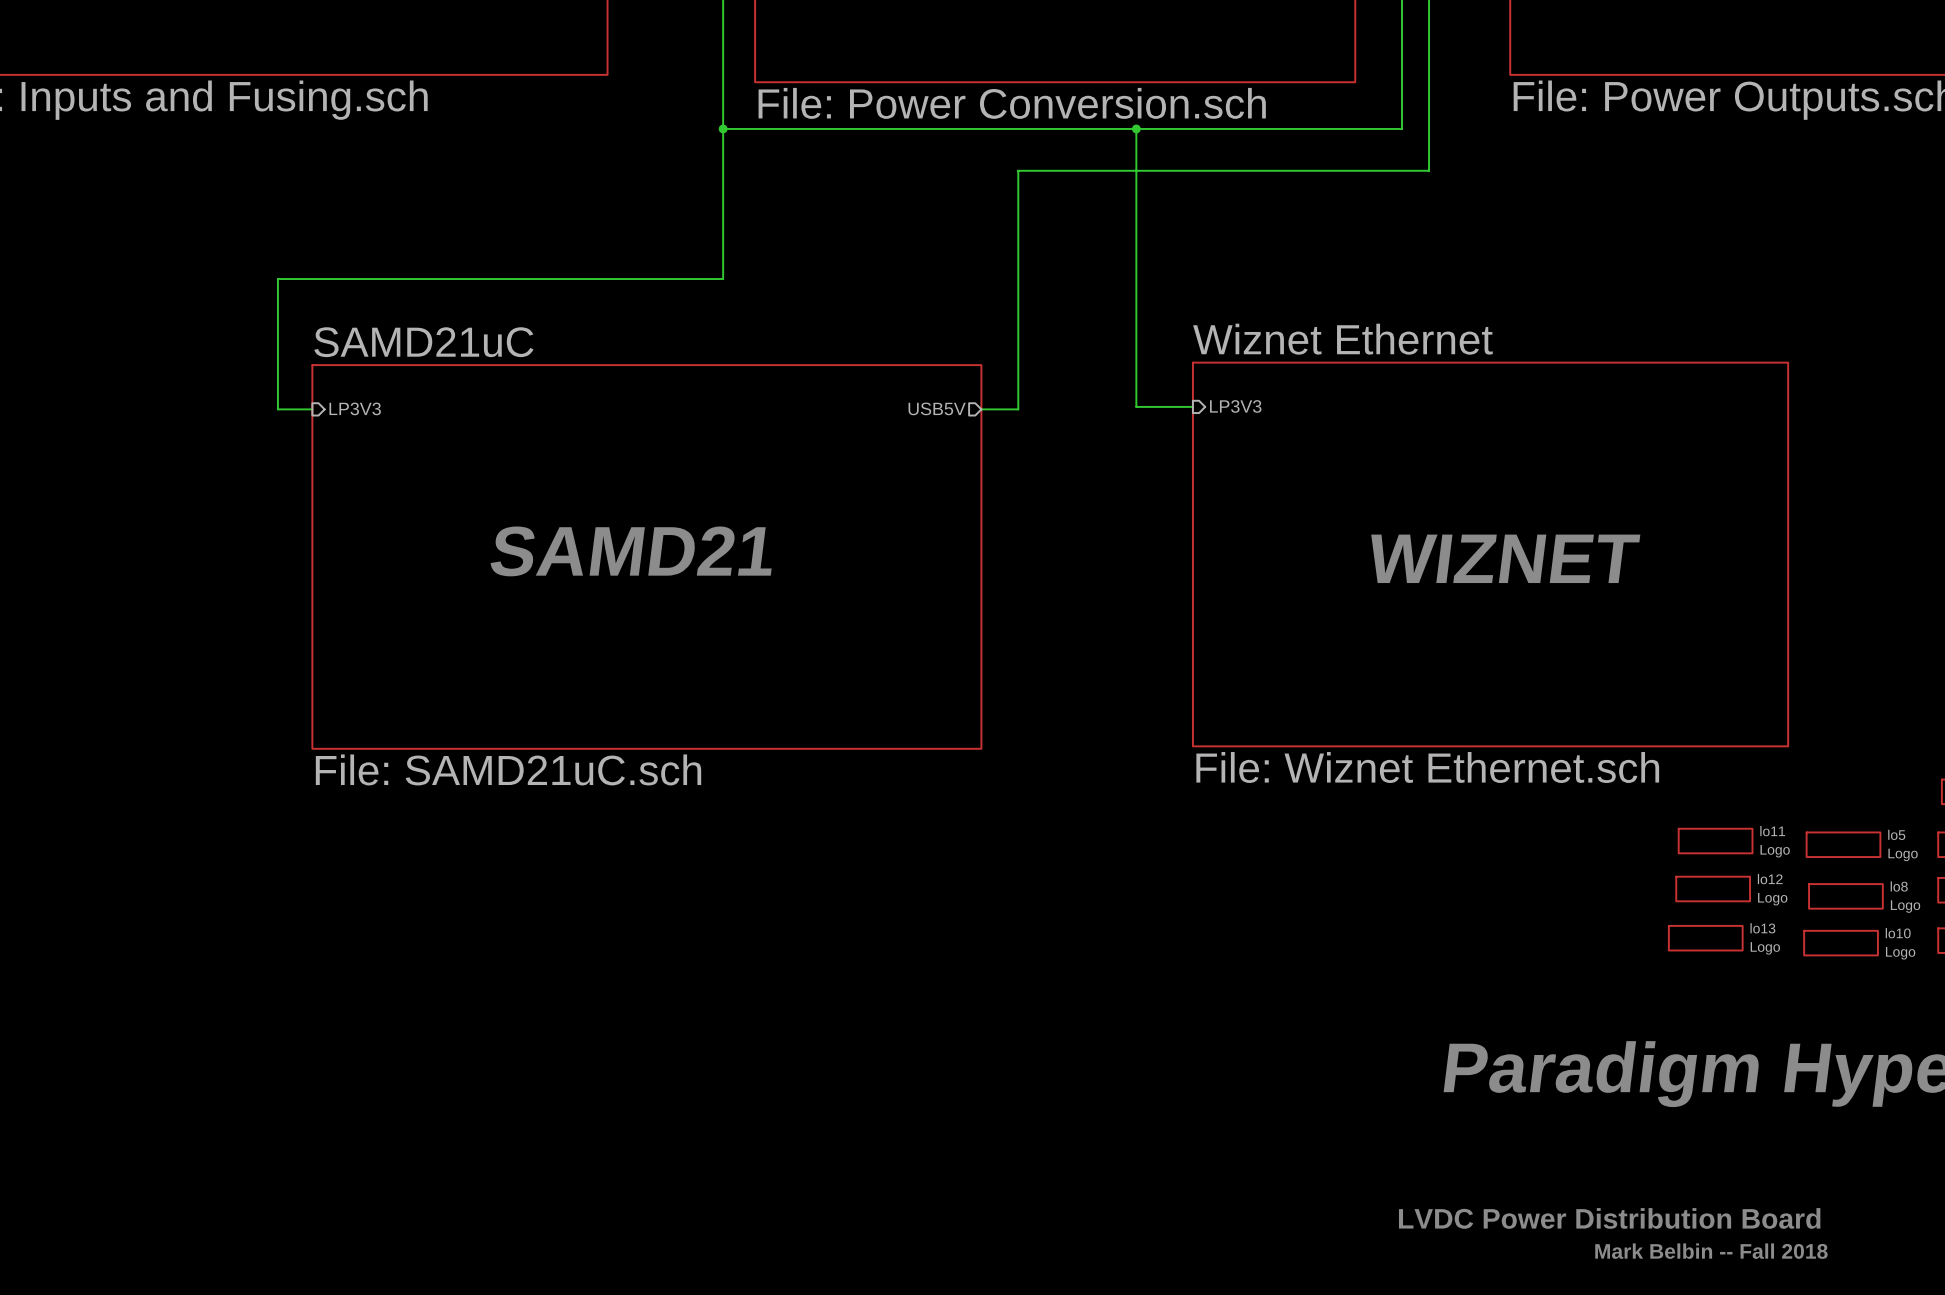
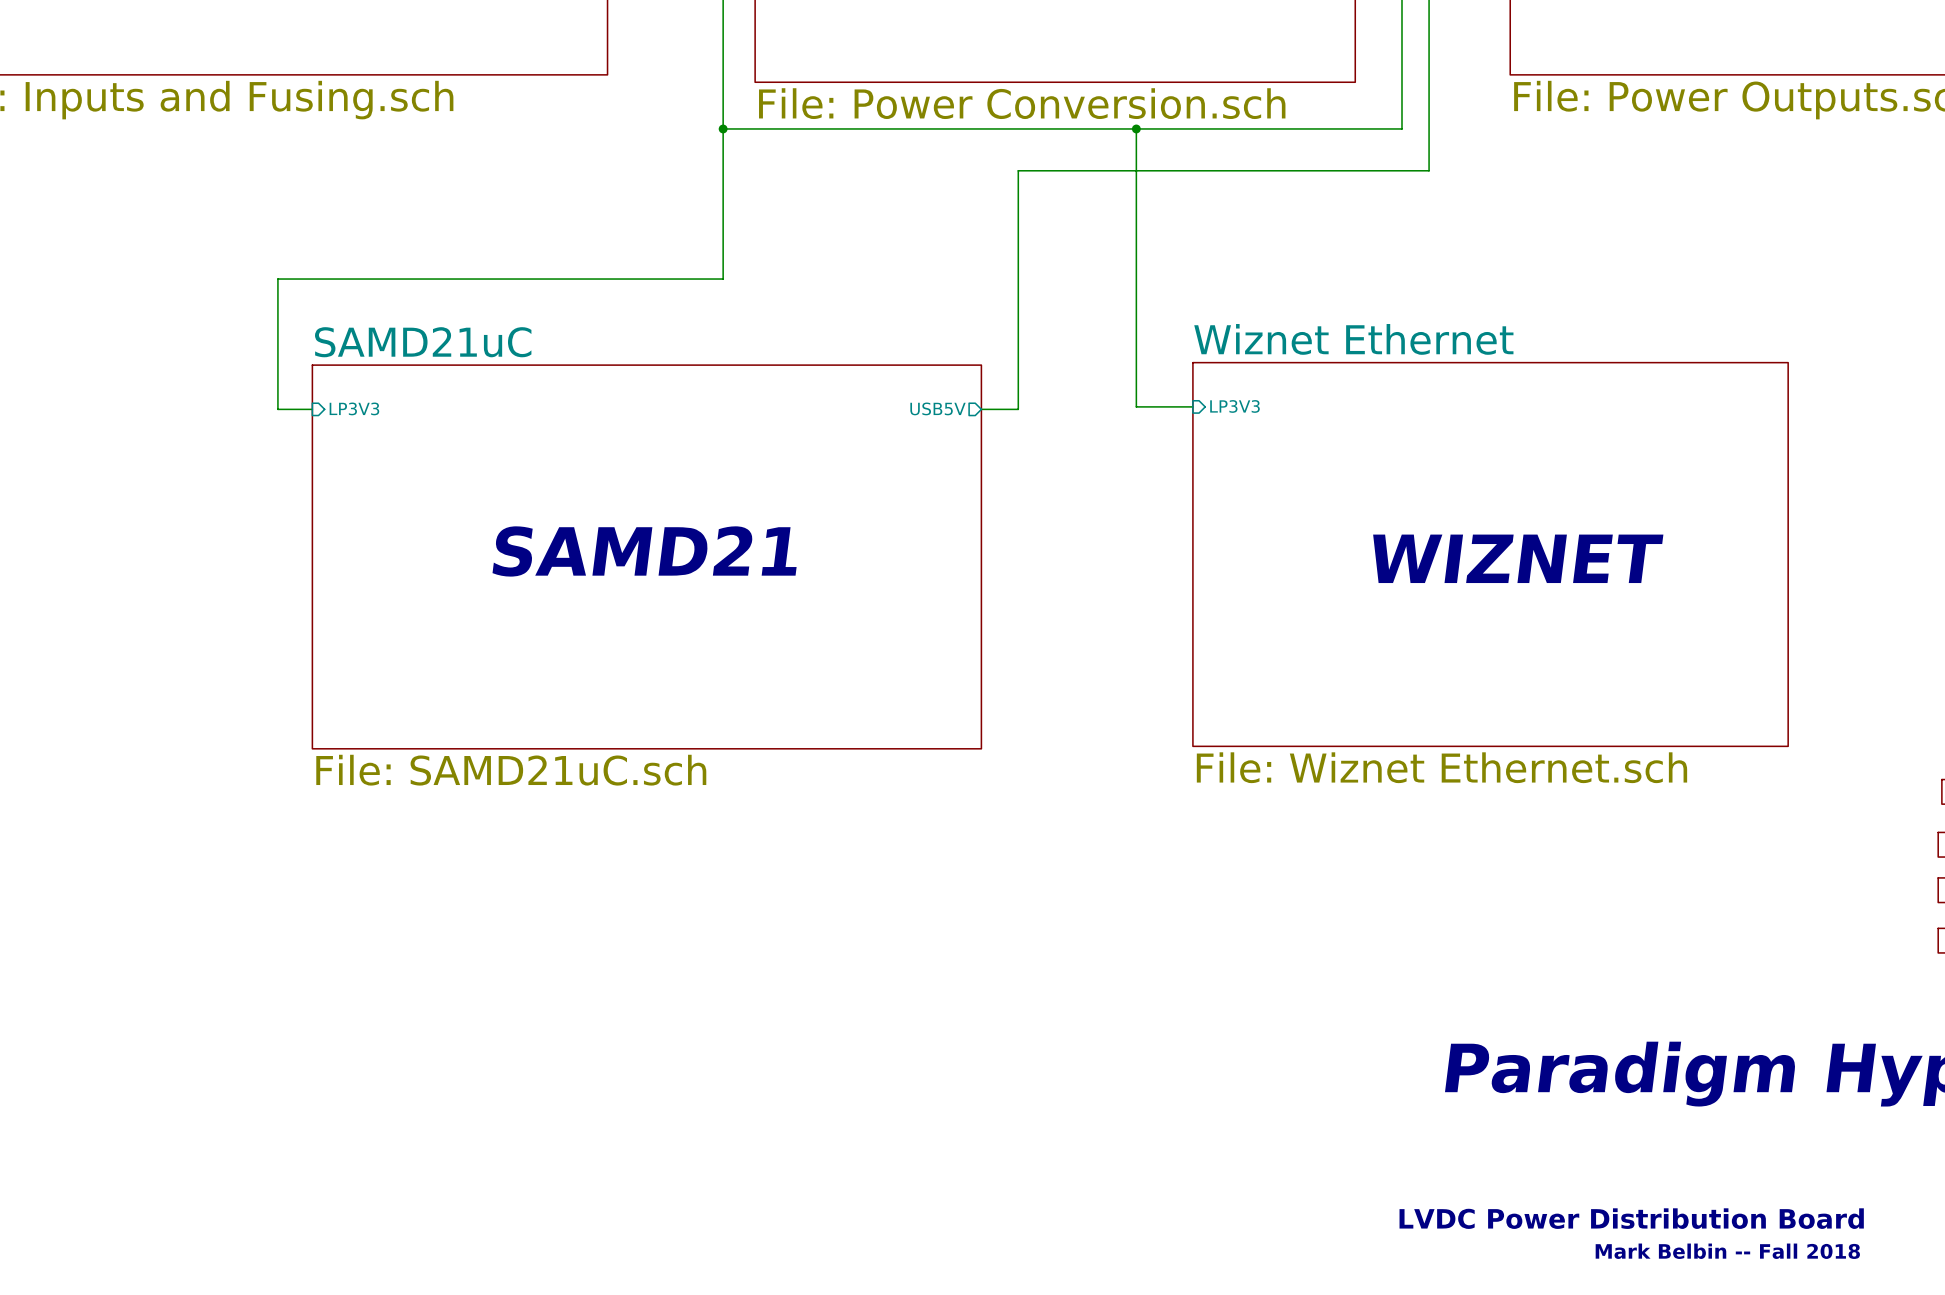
lo11: Logo (1715, 841) -> none
lo5: Logo (1843, 844) -> none
lo12: Logo (1713, 889) -> none
lo8: Logo (1845, 896) -> none
lo13: Logo (1705, 938) -> none
lo10: Logo (1841, 943) -> none

